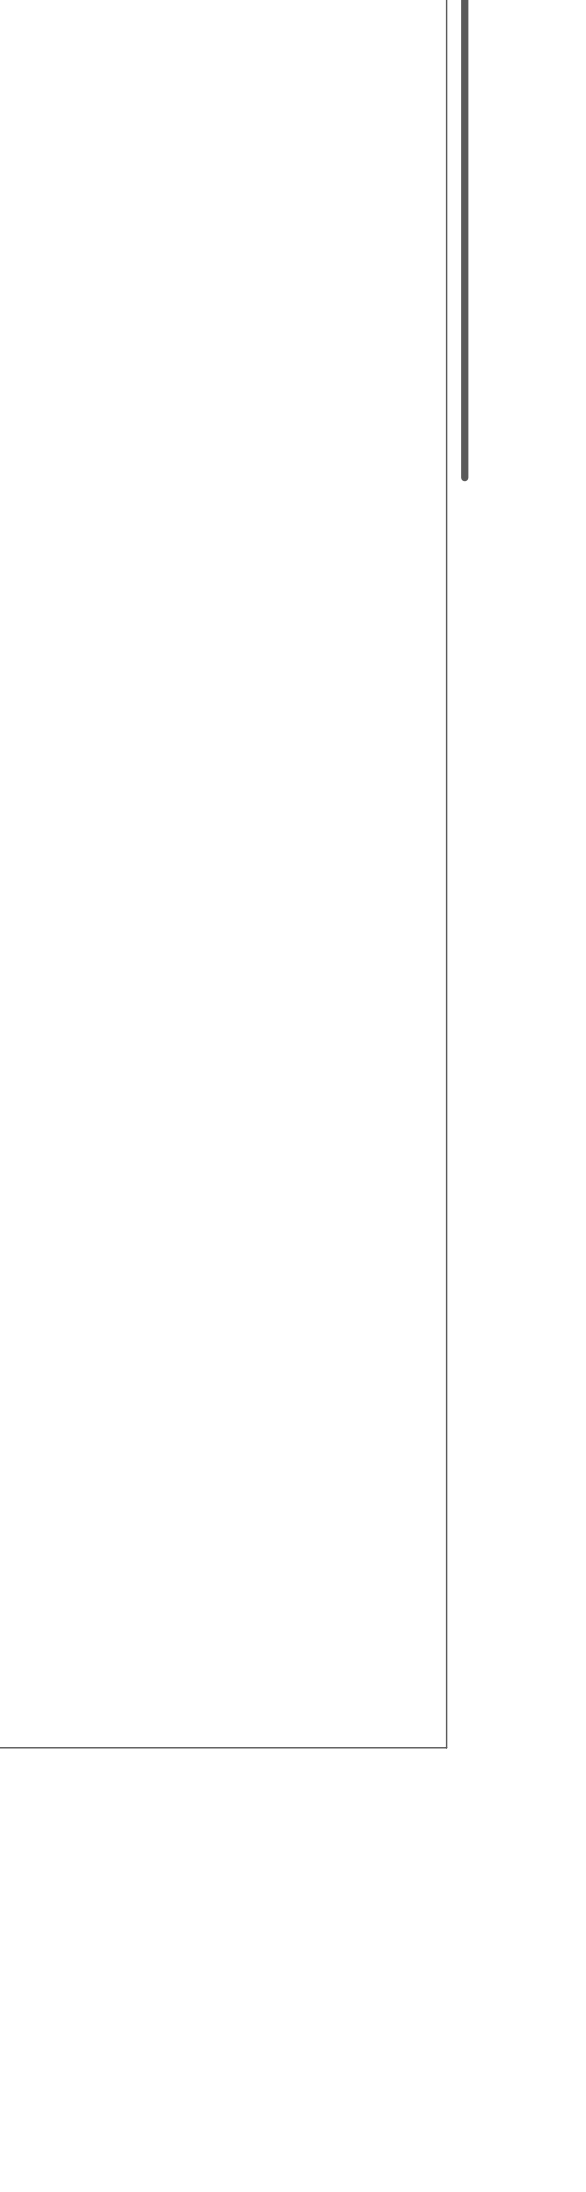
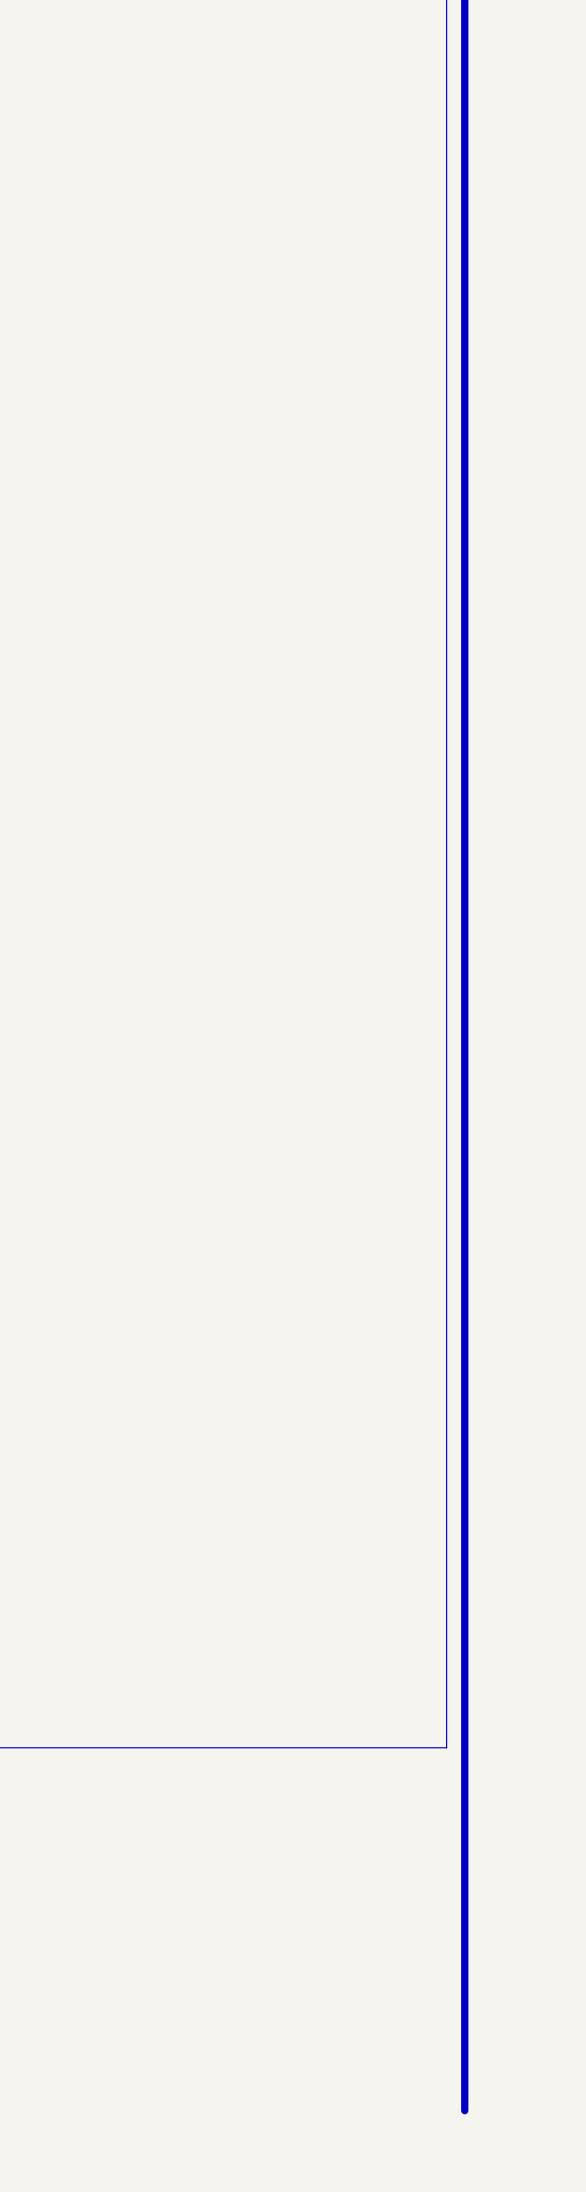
line: none -> (464, 477) (464, 2110)

